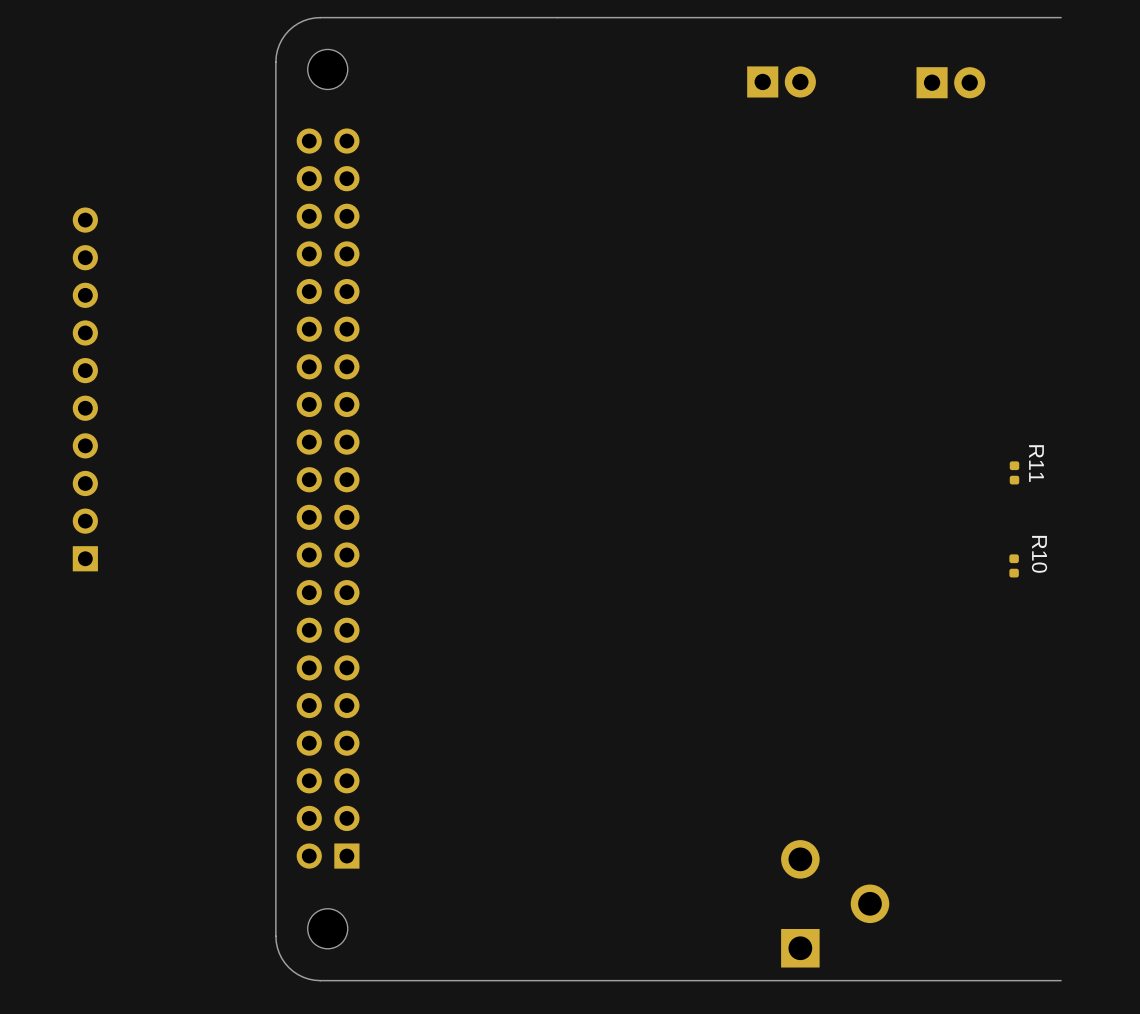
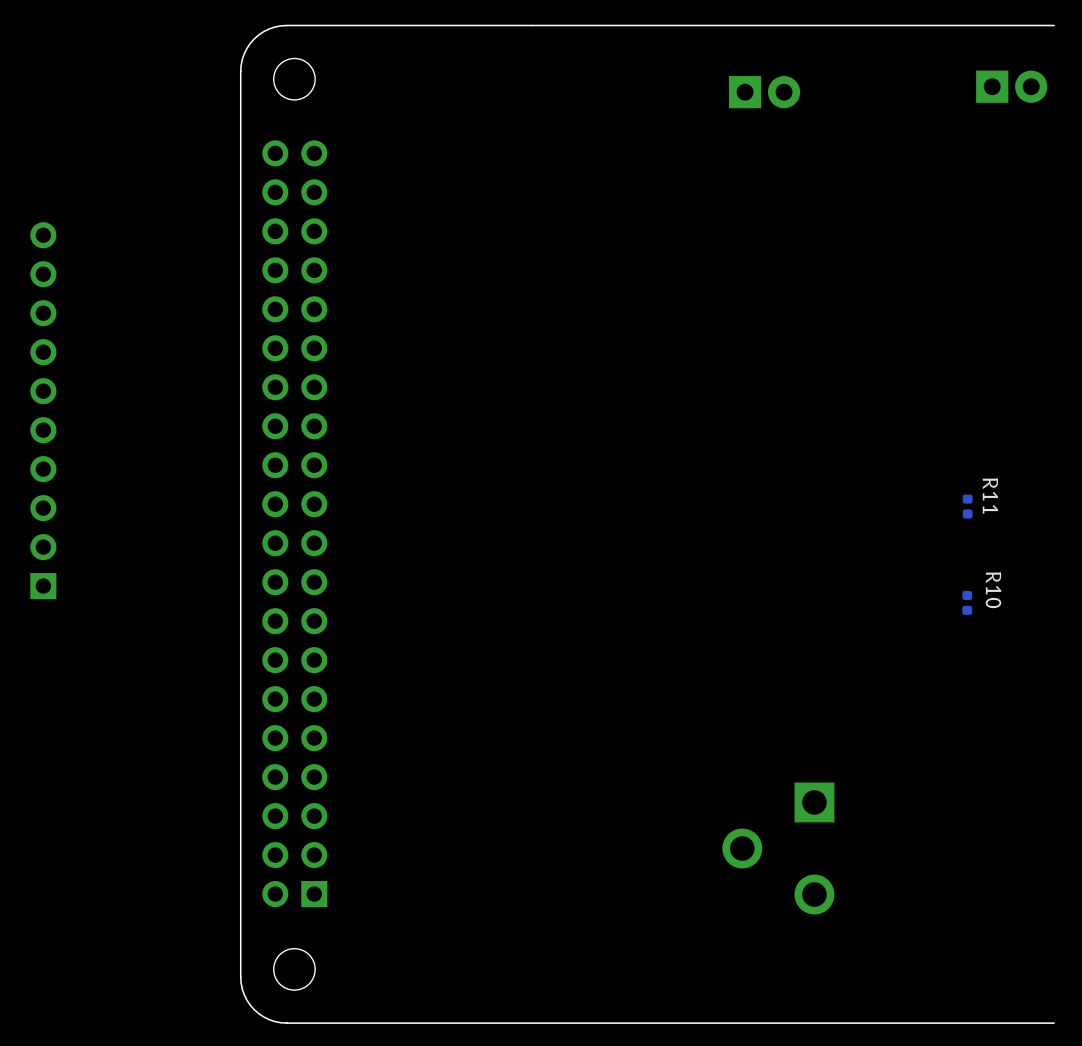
part position: (950, 82) -> (1011, 86)
R11 position: (1014, 472) -> (967, 506)
R10 position: (1014, 565) -> (967, 602)
part rotation: 0° (835, 903) -> 180° (778, 848)
part position: (835, 903) -> (778, 848)

